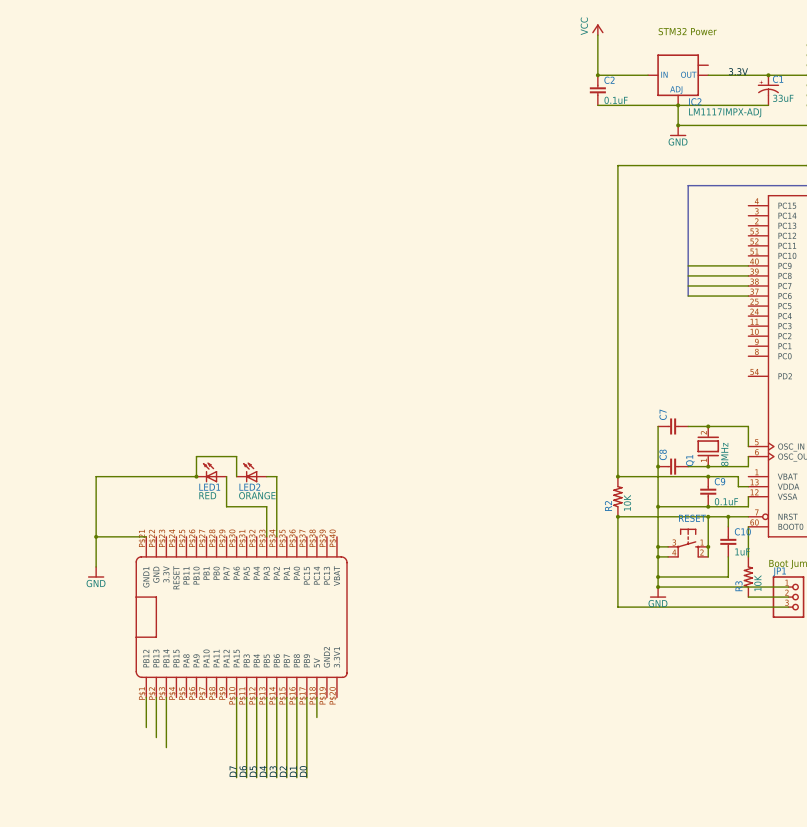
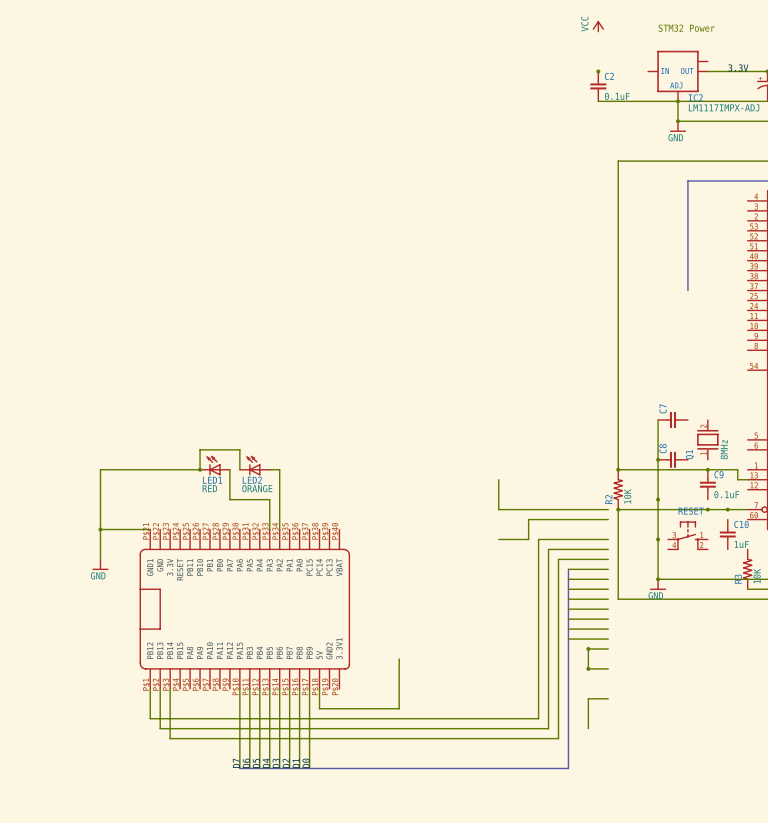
wire: (597, 35) (597, 75) (648, 75) -> none
wire: (688, 265) (748, 265) -> none
wire: (688, 275) (748, 275) -> none
wire: (688, 285) (748, 285) -> none
wire: (688, 296) (748, 296) -> none
wire: (688, 426) (748, 426) (748, 446) -> none
junction: (708, 426) -> none
wire: (748, 456) (748, 466) (688, 466) -> none
junction: (708, 466) -> none
wire: none -> (498, 479) (498, 509) (608, 509)
wire: (748, 496) (748, 506) (658, 506) -> none
junction: (708, 506) -> none
wire: (708, 516) (708, 556) -> none
wire: (728, 516) (728, 526) -> none
wire: none -> (608, 519) (528, 519) (528, 539) (498, 539)
wire: (748, 526) (748, 556) -> none
wire: none -> (608, 539) (538, 539) (538, 718) (150, 718)
wire: (658, 546) (668, 546) -> none
junction: (708, 546) -> none
wire: none -> (608, 549) (548, 549) (548, 728) (160, 728)
wire: (658, 556) (668, 556) -> none
junction: (658, 556) -> none
wire: (728, 556) (728, 576) (658, 576) -> none
wire: none -> (608, 559) (558, 559) (558, 738) (170, 738)
bus: none -> (568, 569) (568, 768) (239, 768)
wire: none -> (568, 569) (608, 569)
junction: (658, 576) -> none
wire: none -> (568, 579) (608, 579)
wire: none -> (568, 589) (608, 589)
wire: none -> (568, 599) (608, 599)
wire: none -> (568, 609) (608, 609)
wire: none -> (568, 619) (608, 619)
wire: none -> (568, 629) (608, 629)
wire: none -> (568, 639) (608, 639)
junction: none -> (588, 649)
wire: none -> (608, 649) (588, 649) (588, 668) (608, 668)
wire: none -> (399, 658) (399, 708) (319, 708)
junction: none -> (588, 668)
wire: none -> (608, 698) (588, 698) (588, 728)

